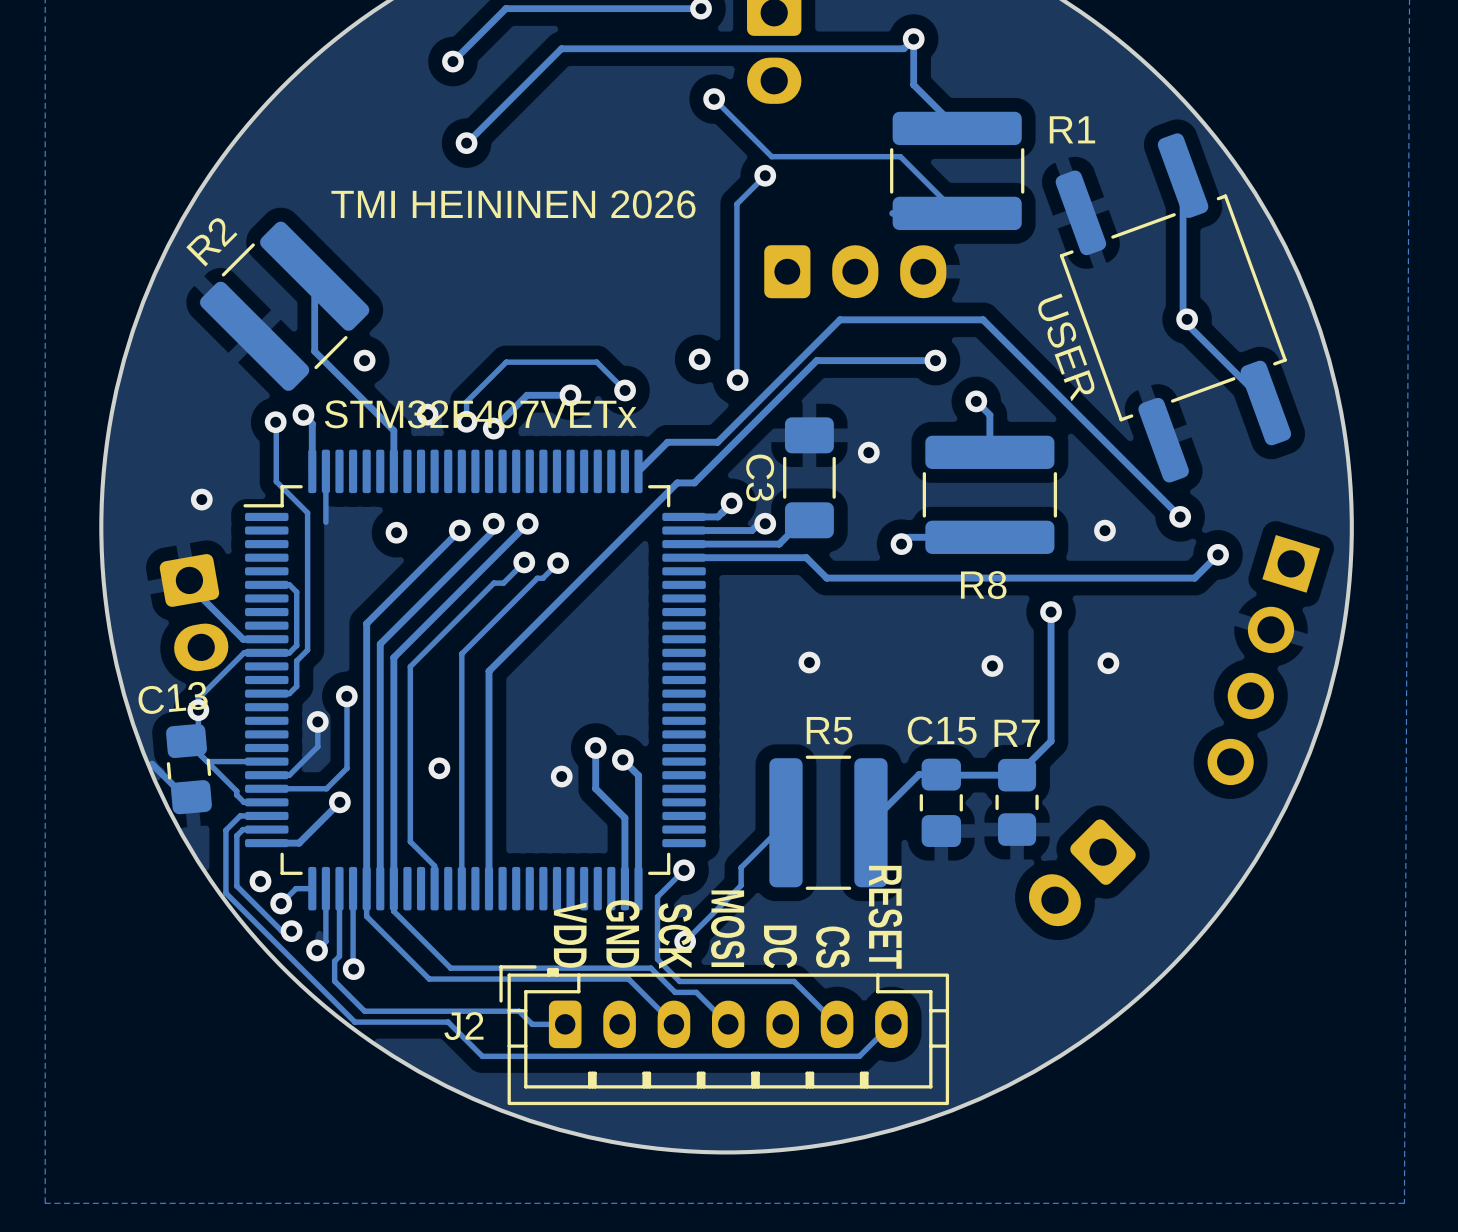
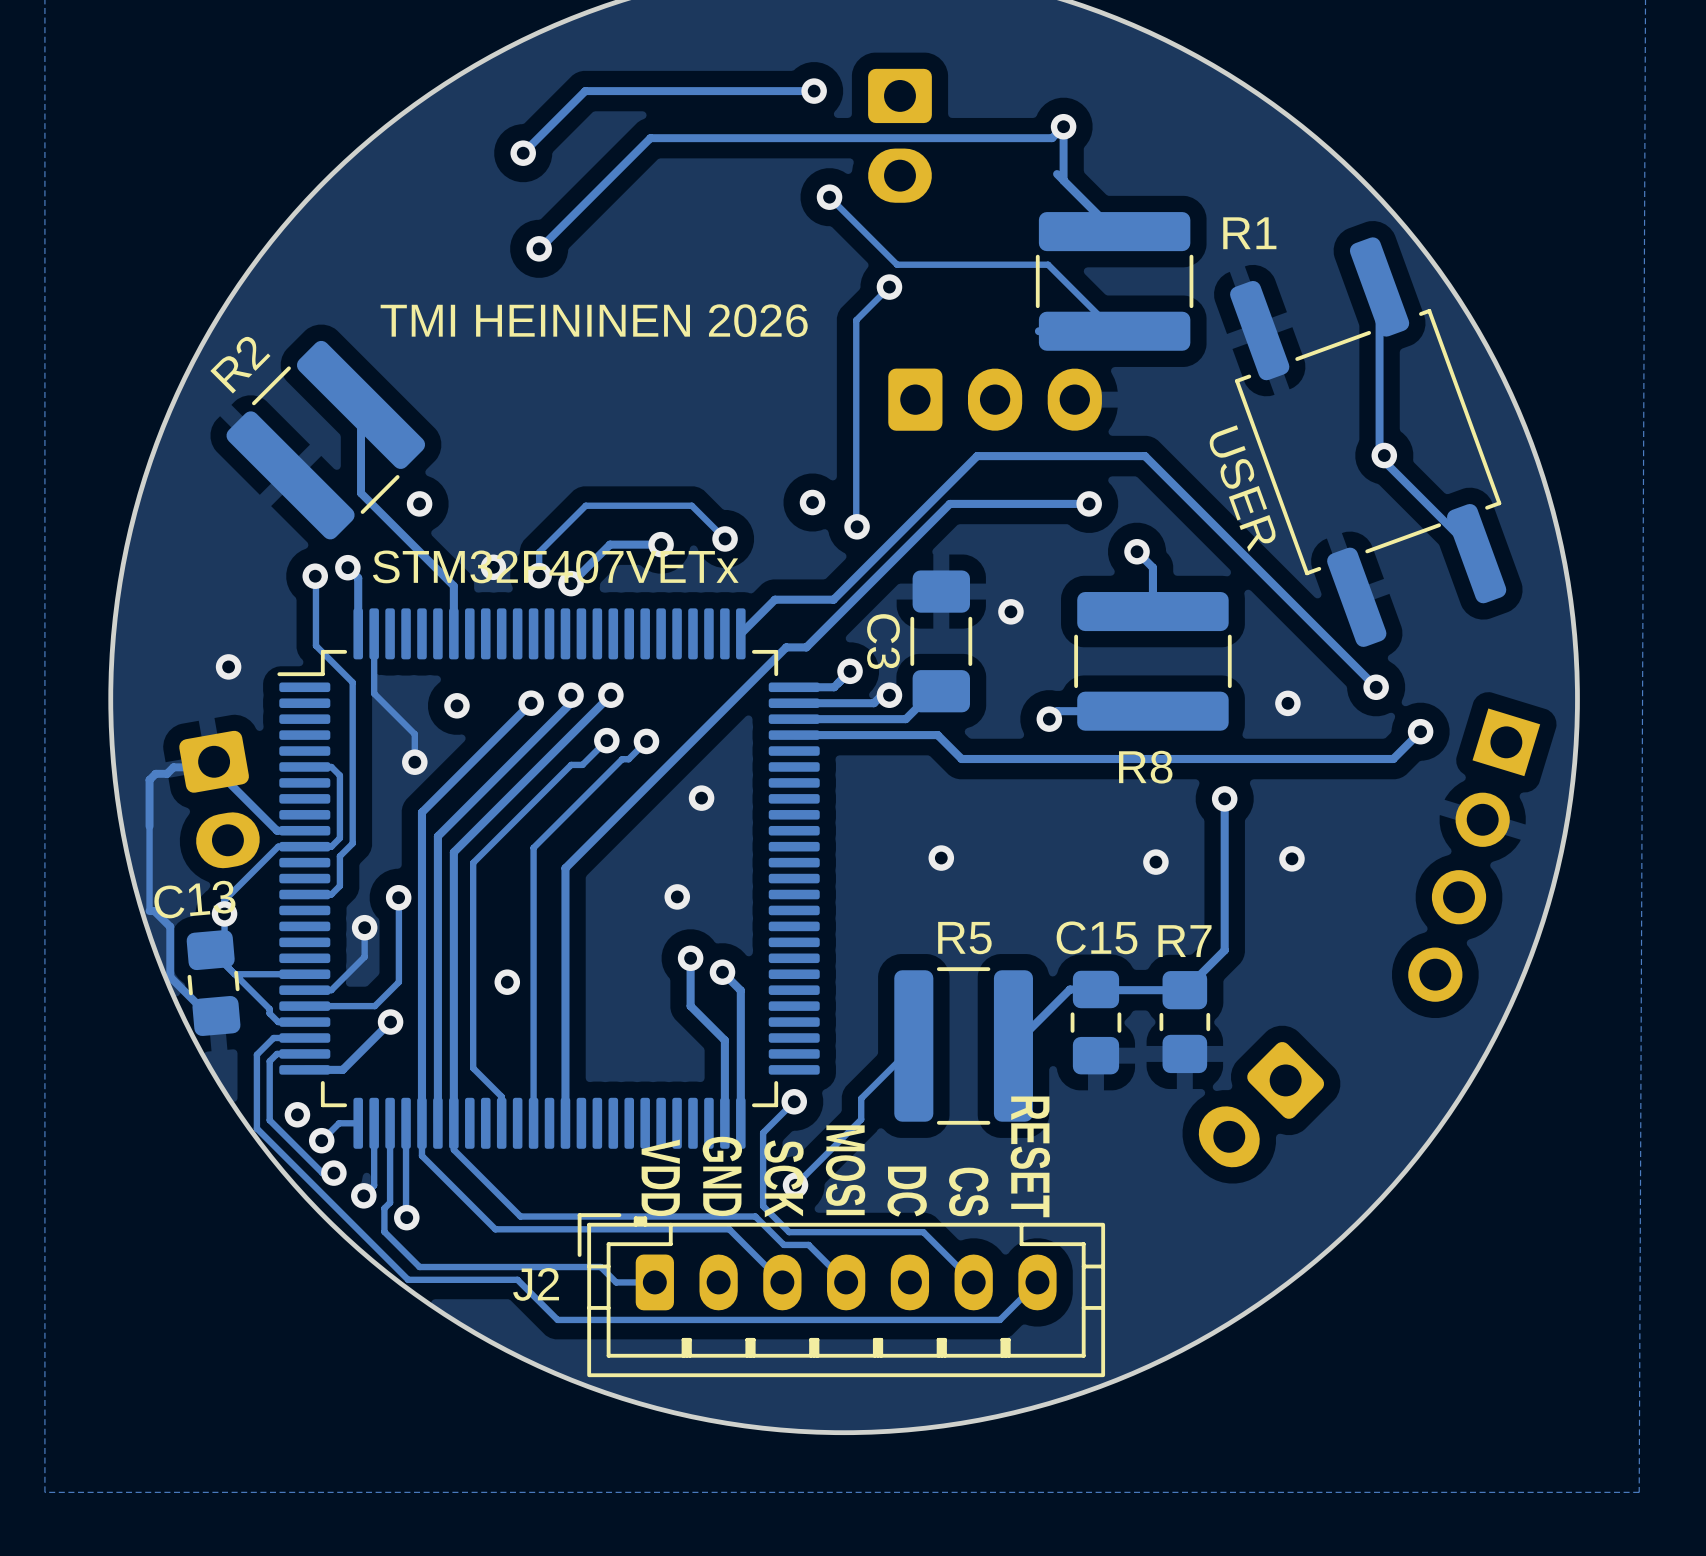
track: none -> (1057, 174) (1063, 180)
track: none -> (374, 693) (414, 734) (414, 762)
via: none -> (414, 762)
track: none -> (208, 767) (173, 767) (167, 773) (155, 773) (149, 779) (149, 911) (154, 911) (170, 926) (170, 977)
via: none -> (701, 798)
via position: (561, 776) -> (677, 896)

